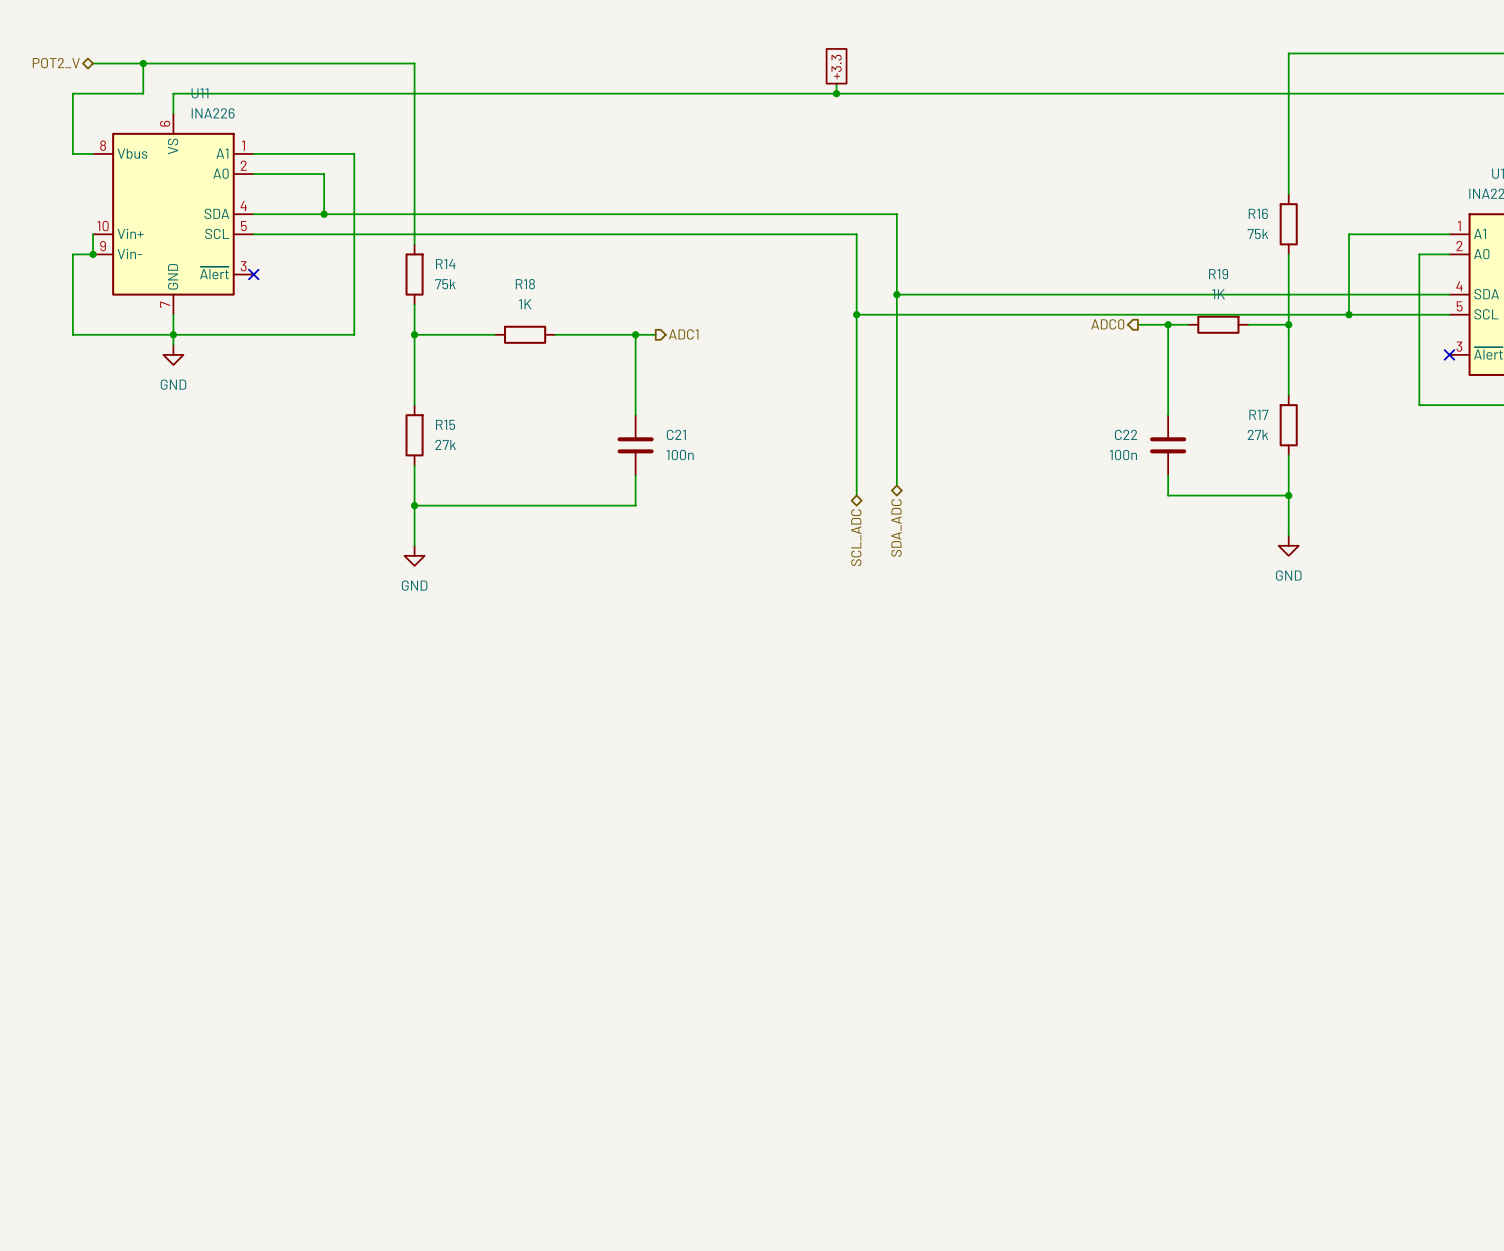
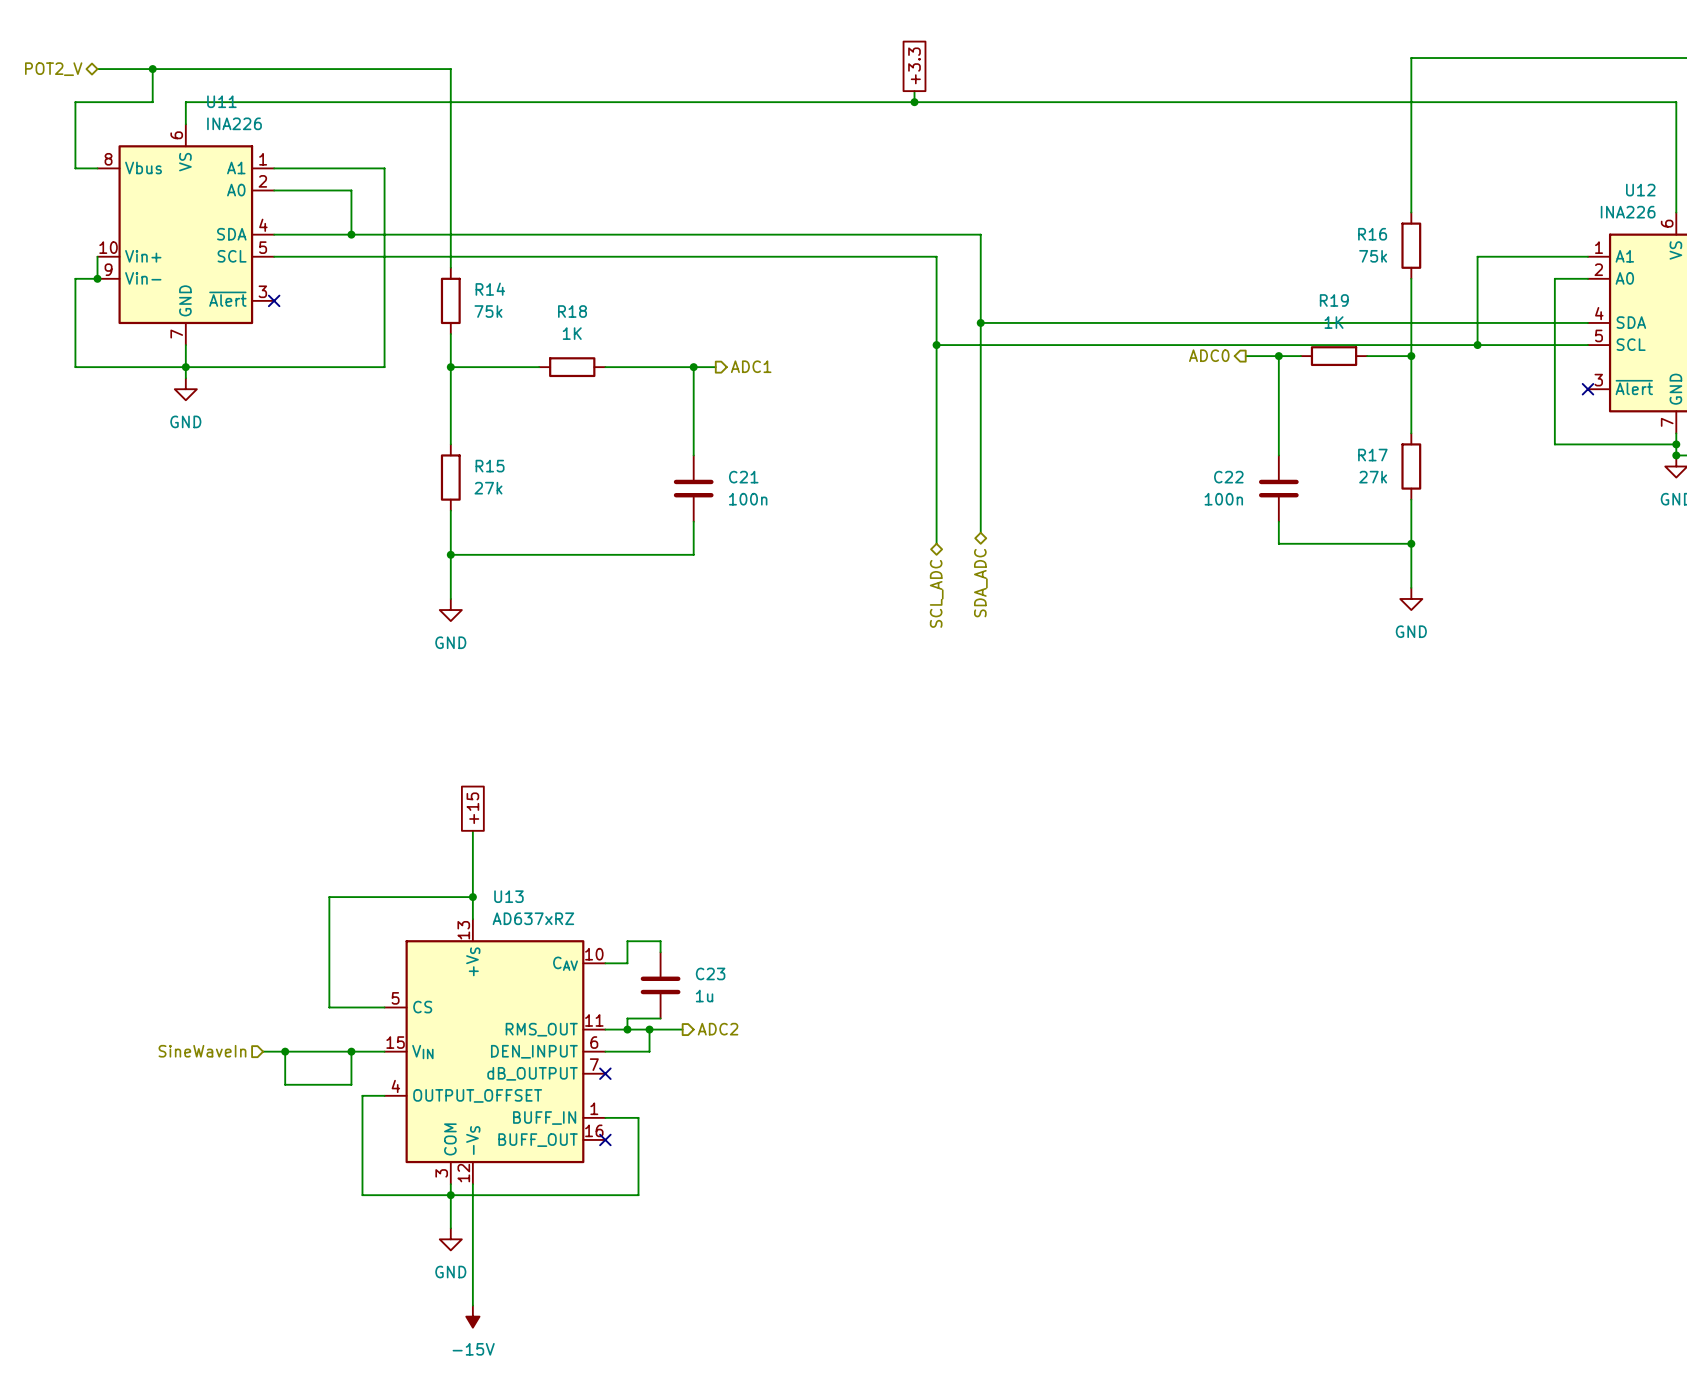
global label: none -> +15 (472, 808)
wire: none -> (472, 830) (472, 919)
wire: none -> (472, 897) (329, 897) (329, 1007) (384, 1007)
junction: none -> (472, 897)
wire: none -> (660, 952) (660, 941) (627, 941) (627, 963) (605, 963)
C23: none -> 1u (660, 985)
wire: none -> (660, 1018) (627, 1018) (627, 1029)
wire: none -> (605, 1029) (682, 1029)
junction: none -> (627, 1029)
wire: none -> (649, 1029) (649, 1051) (605, 1051)
junction: none -> (649, 1029)
hierarchical label: none -> ADC2 (718, 1029)
hierarchical label: none -> SineWaveIn (202, 1051)
wire: none -> (263, 1051) (384, 1051)
wire: none -> (285, 1051) (285, 1084) (351, 1084) (351, 1051)
junction: none -> (285, 1051)
junction: none -> (351, 1051)
U13: none -> AD637xRZ (494, 1051)
no-connect mark: none -> (605, 1073)
wire: none -> (384, 1095) (362, 1095) (362, 1195) (638, 1195) (638, 1117) (605, 1117)
no-connect mark: none -> (605, 1139)
wire: none -> (450, 1184) (450, 1228)
wire: none -> (472, 1184) (472, 1305)
junction: none -> (450, 1195)
power symbol: none -> GND (450, 1239)
power symbol: none -> -15V (472, 1316)

